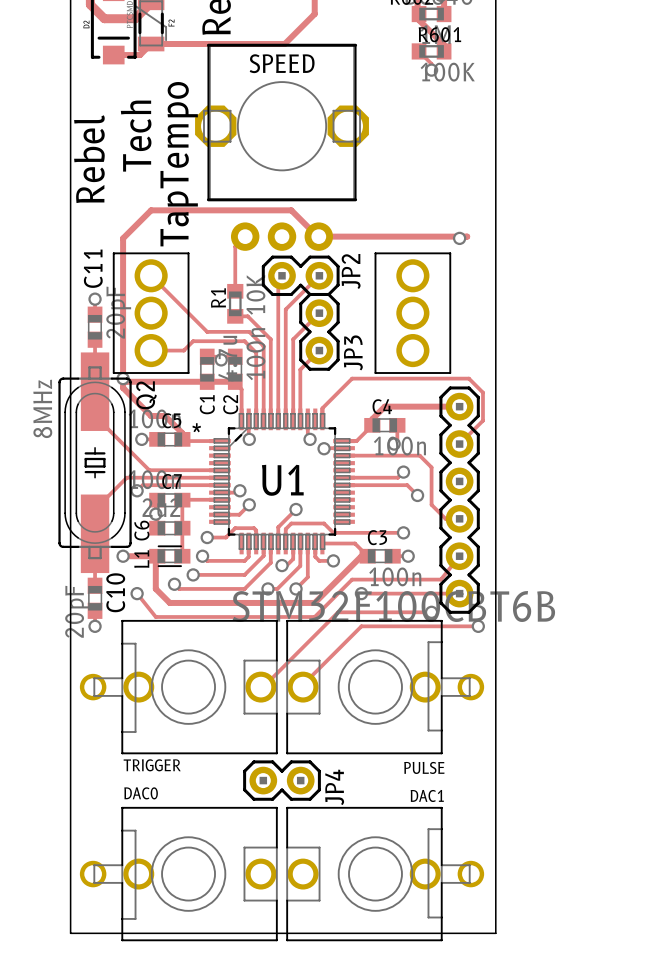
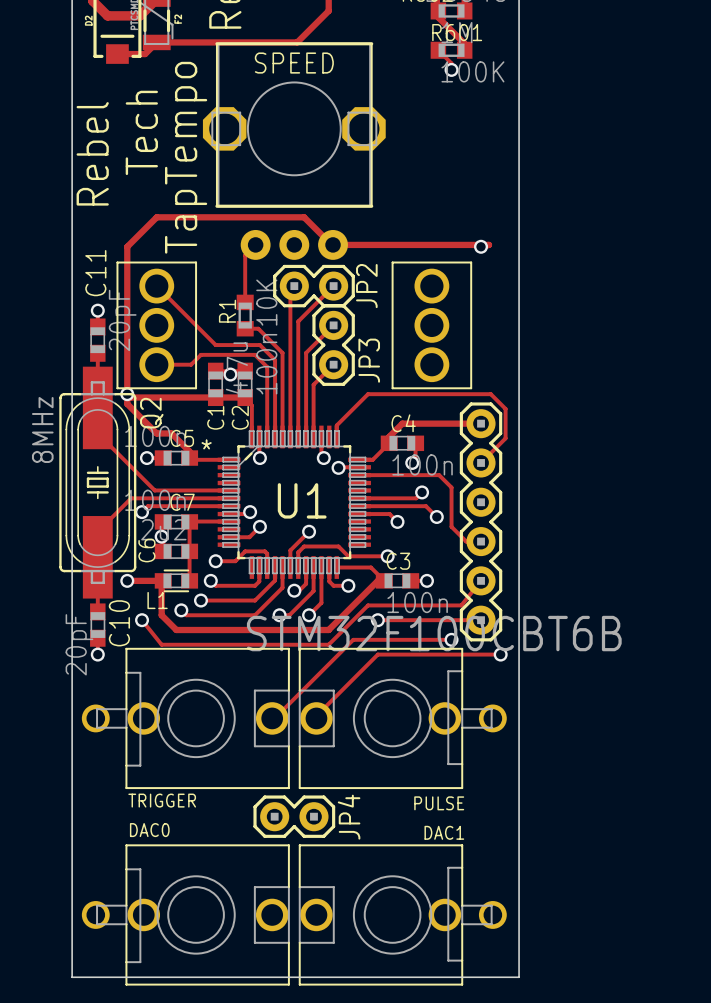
track: none -> (359, 514) (389, 514) (397, 521)
via: none -> (397, 521)
track: (370, 532) (403, 532) -> none
via: none -> (387, 556)
via: (403, 532) -> none
L1 name rotation: 0° (141, 559) -> 90° clockwise (157, 600)

